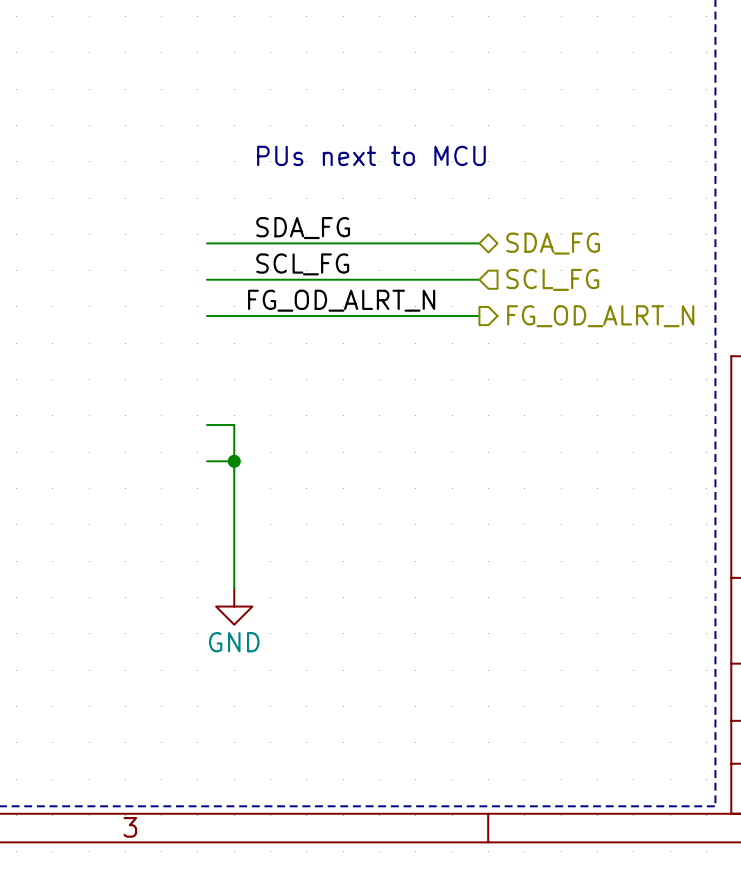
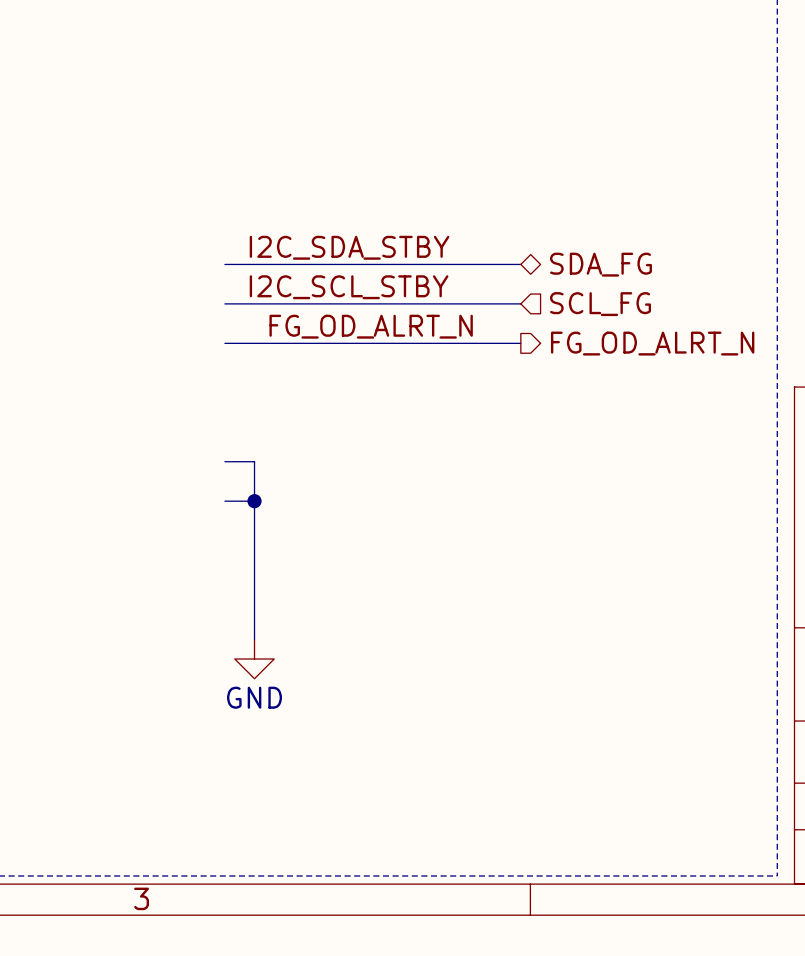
text: PUs next to MCU (371, 155) -> none
label: SDA_FG (303, 228) -> none
label: none -> I2C_SDA_STBY (349, 247)
label: SCL_FG (302, 264) -> none
label: none -> I2C_SCL_STBY (349, 287)

